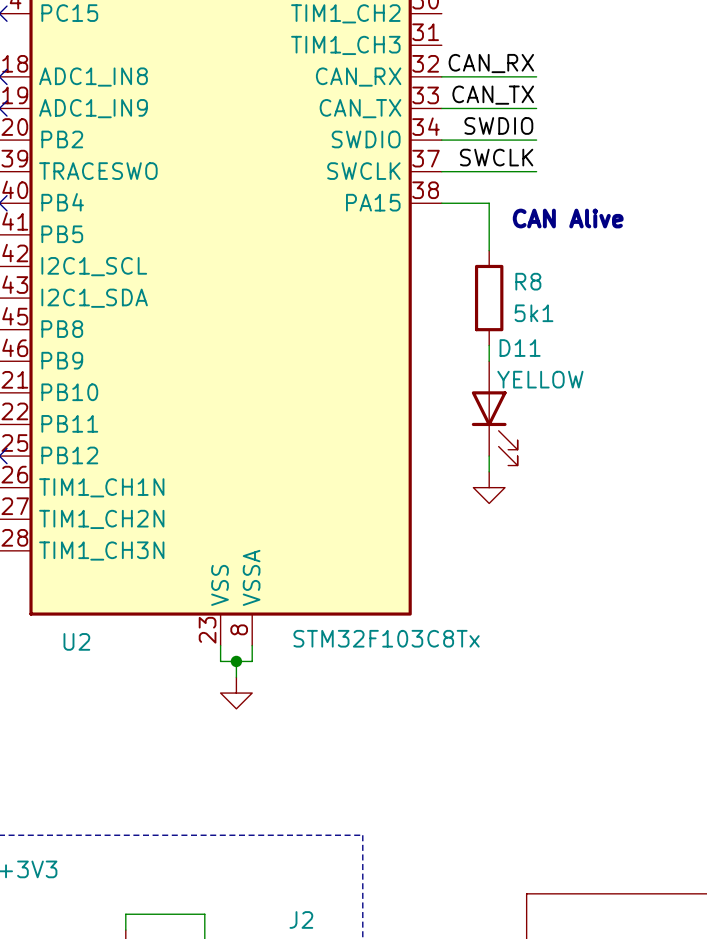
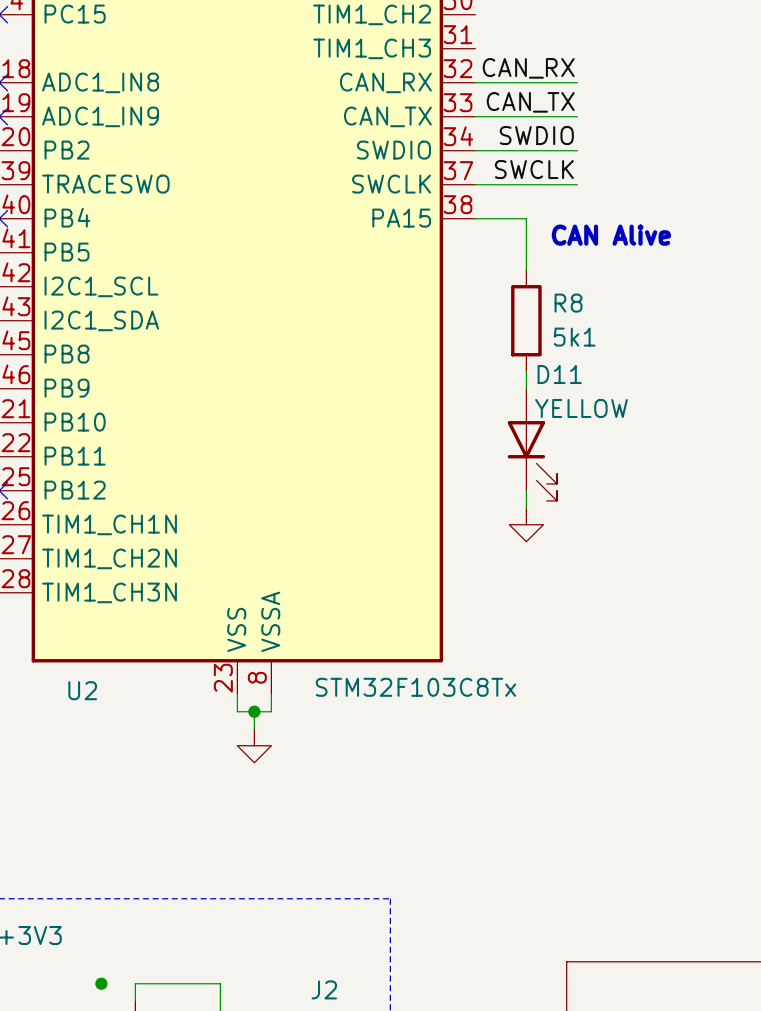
junction: none -> (101, 983)

